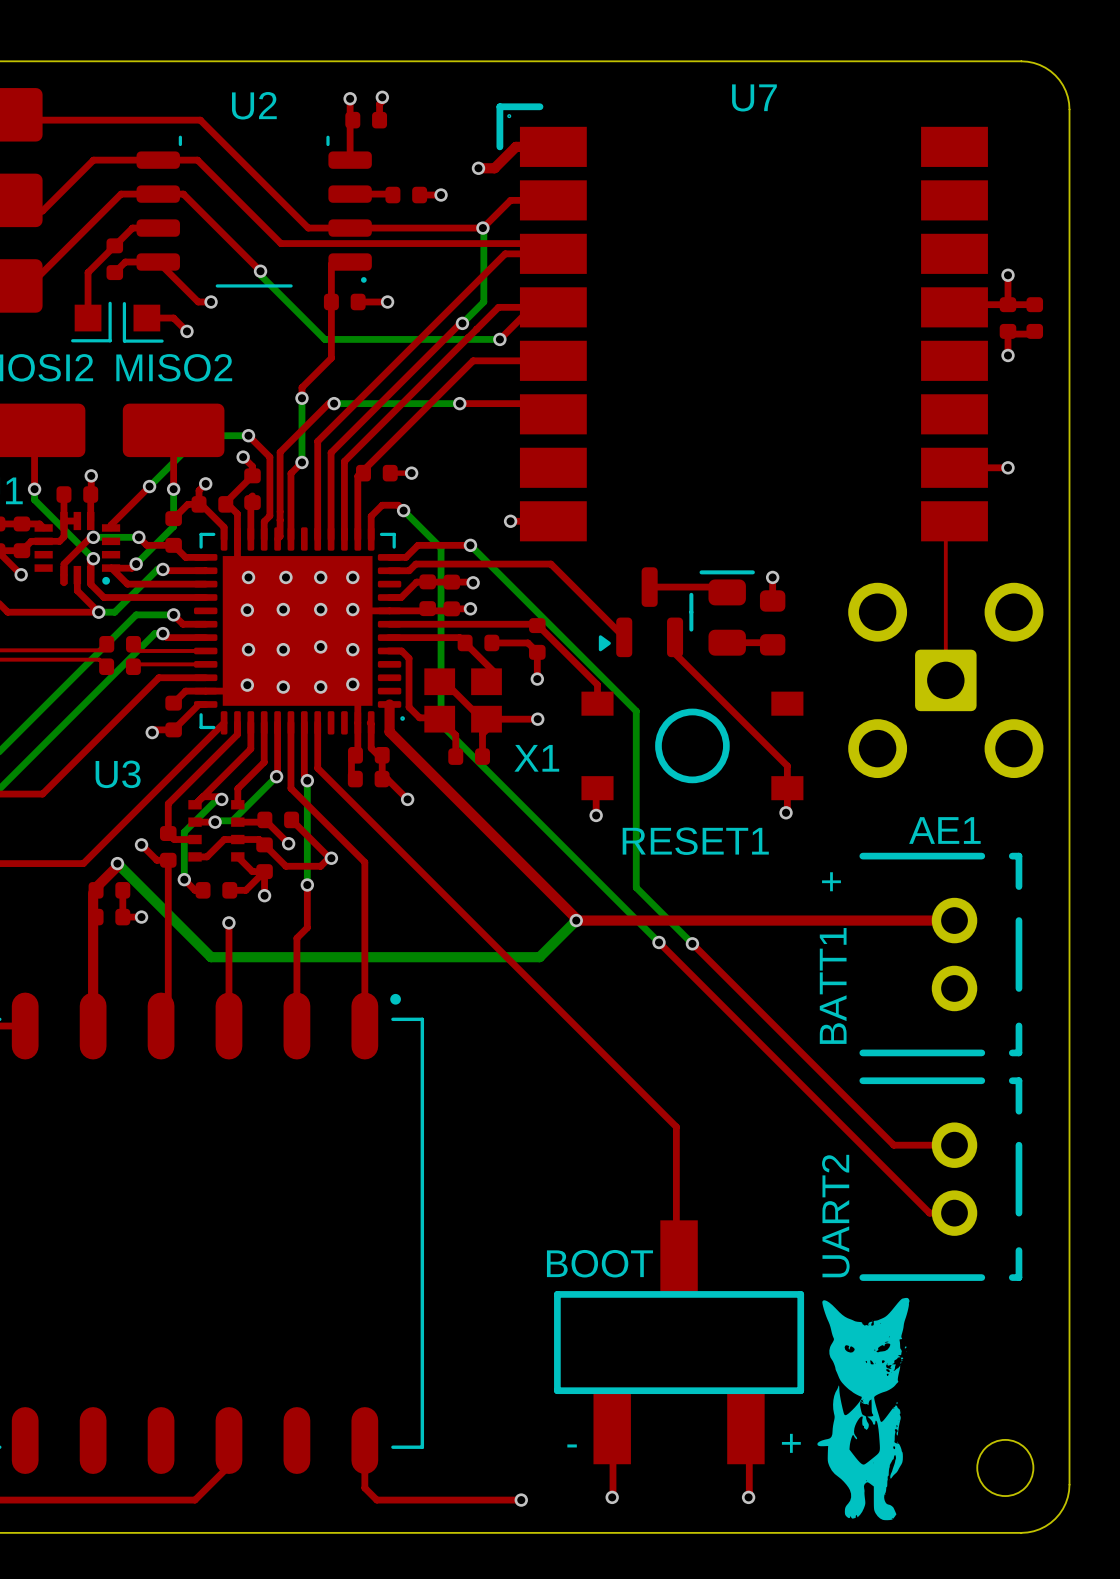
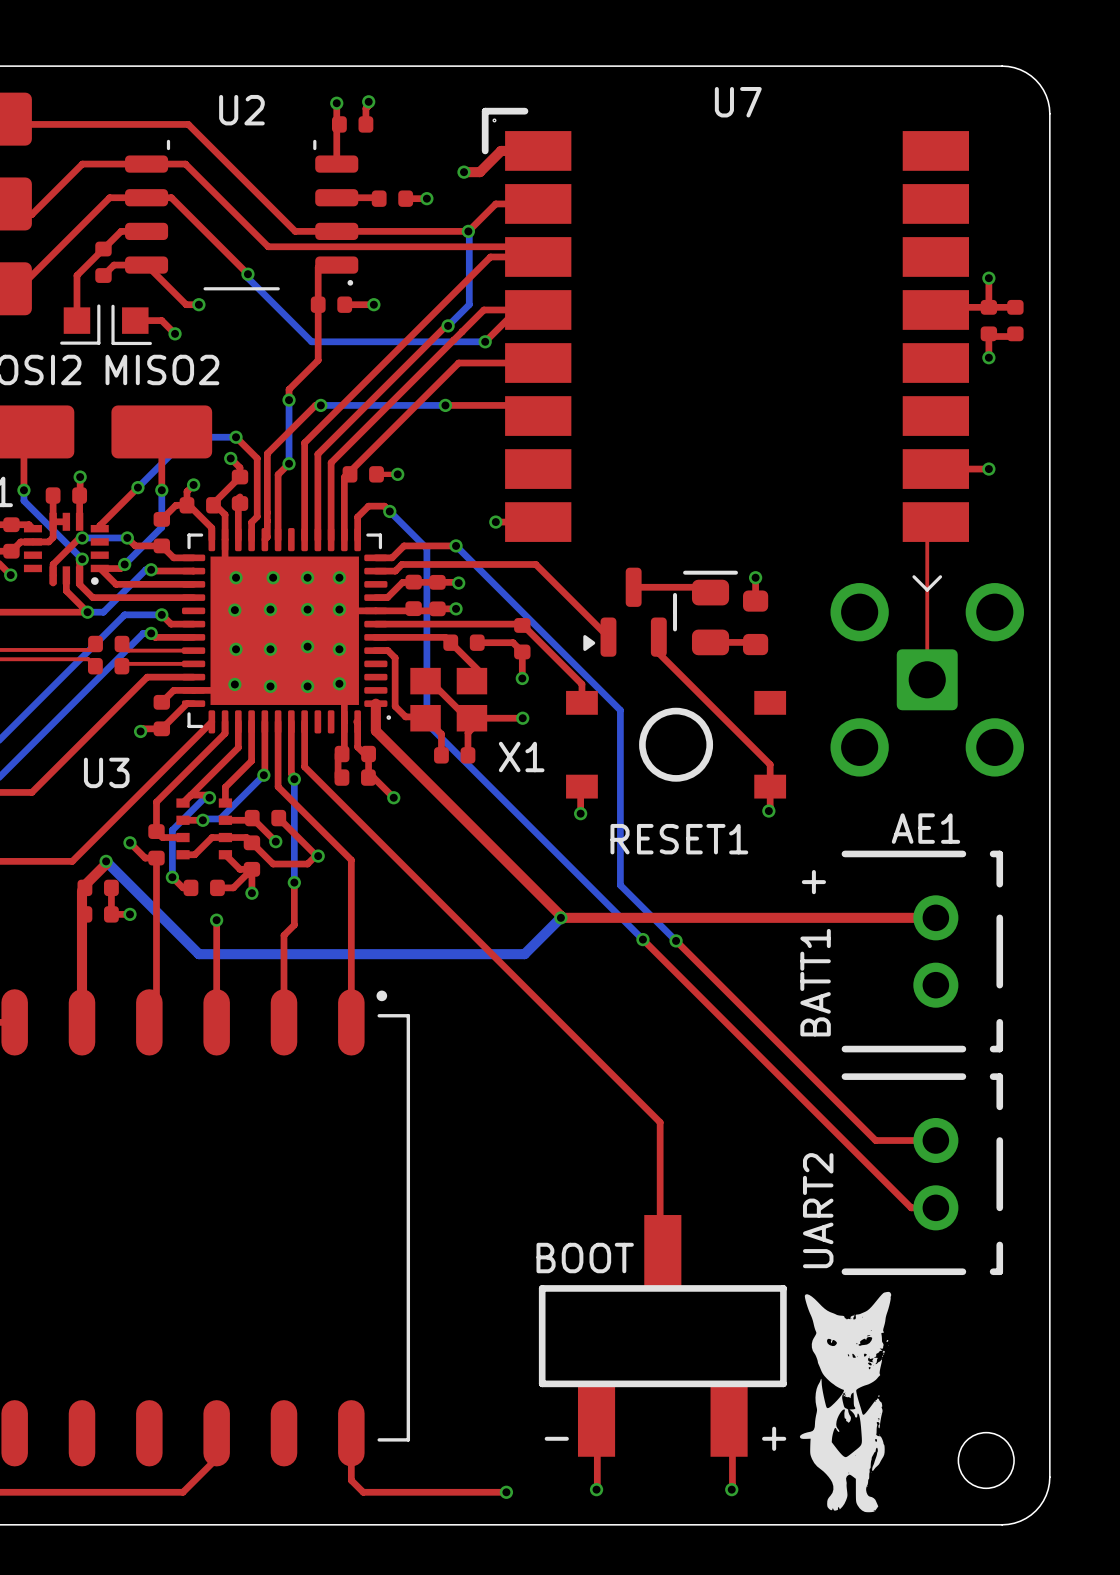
AE1 footprint: [848, 582, 1044, 779] -> [830, 575, 1025, 777]

